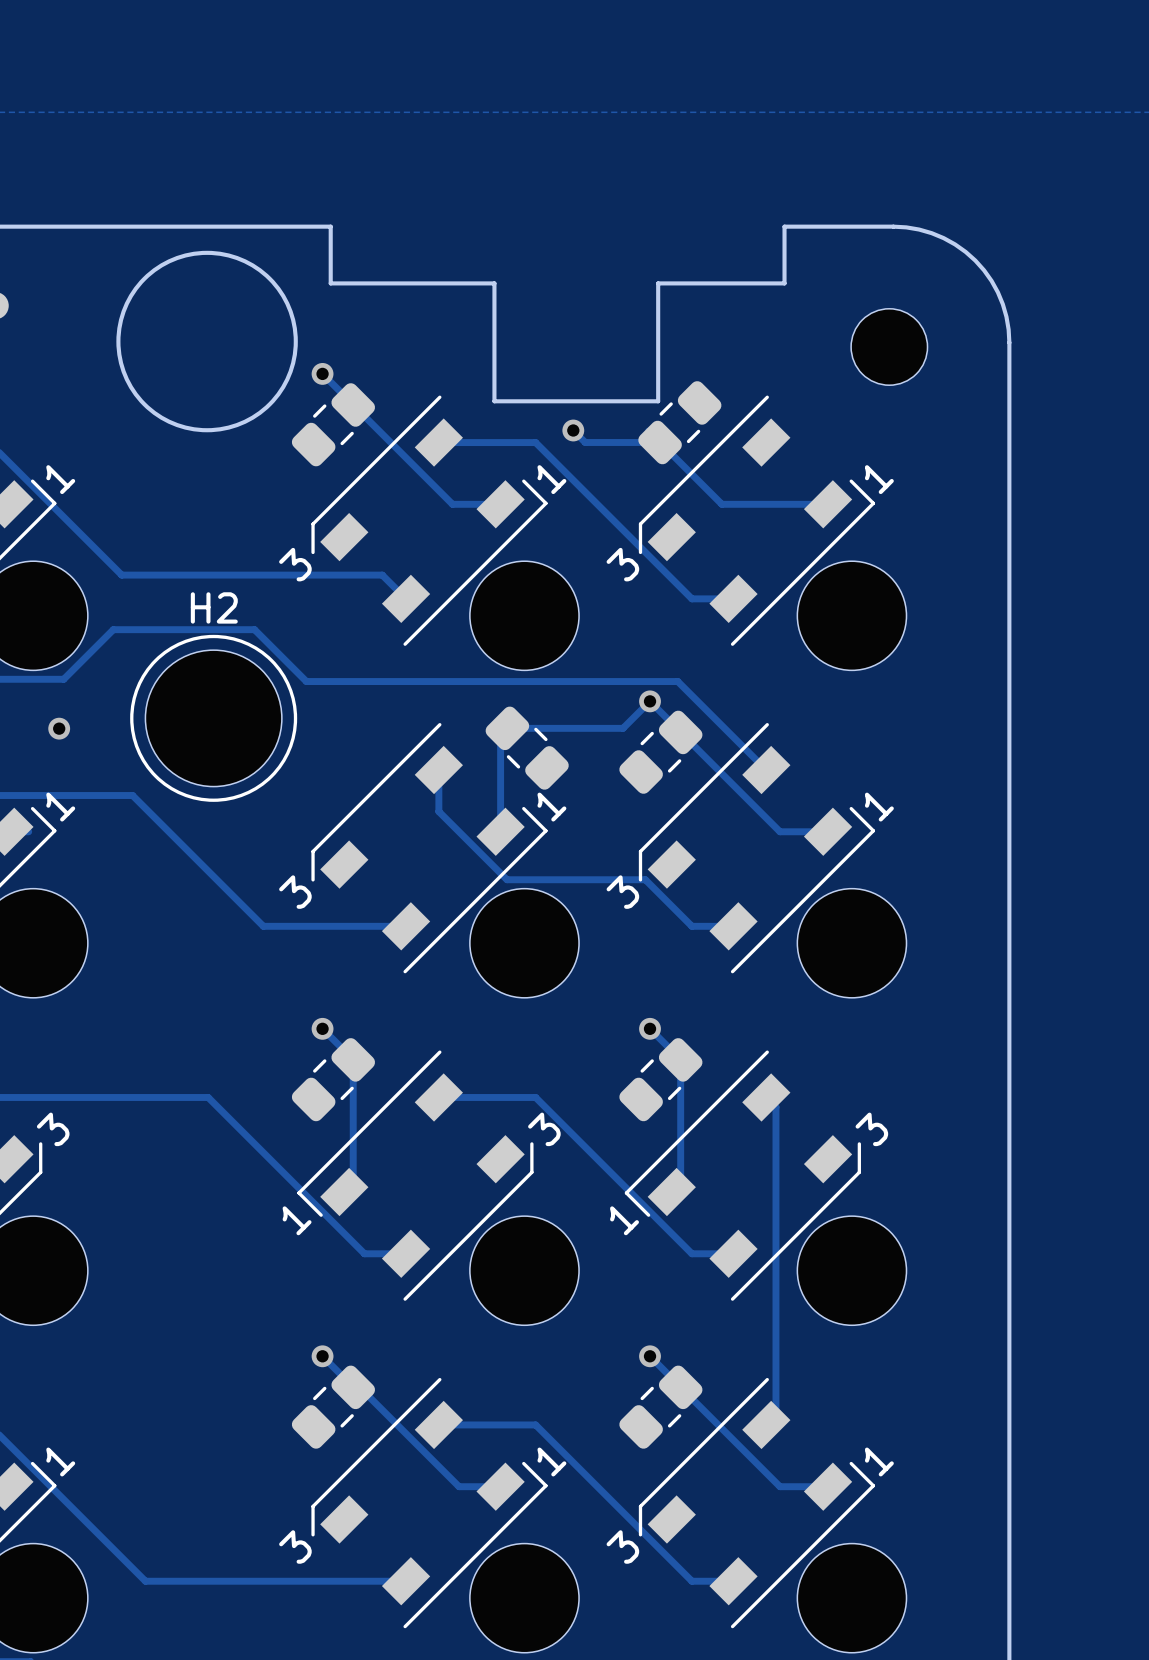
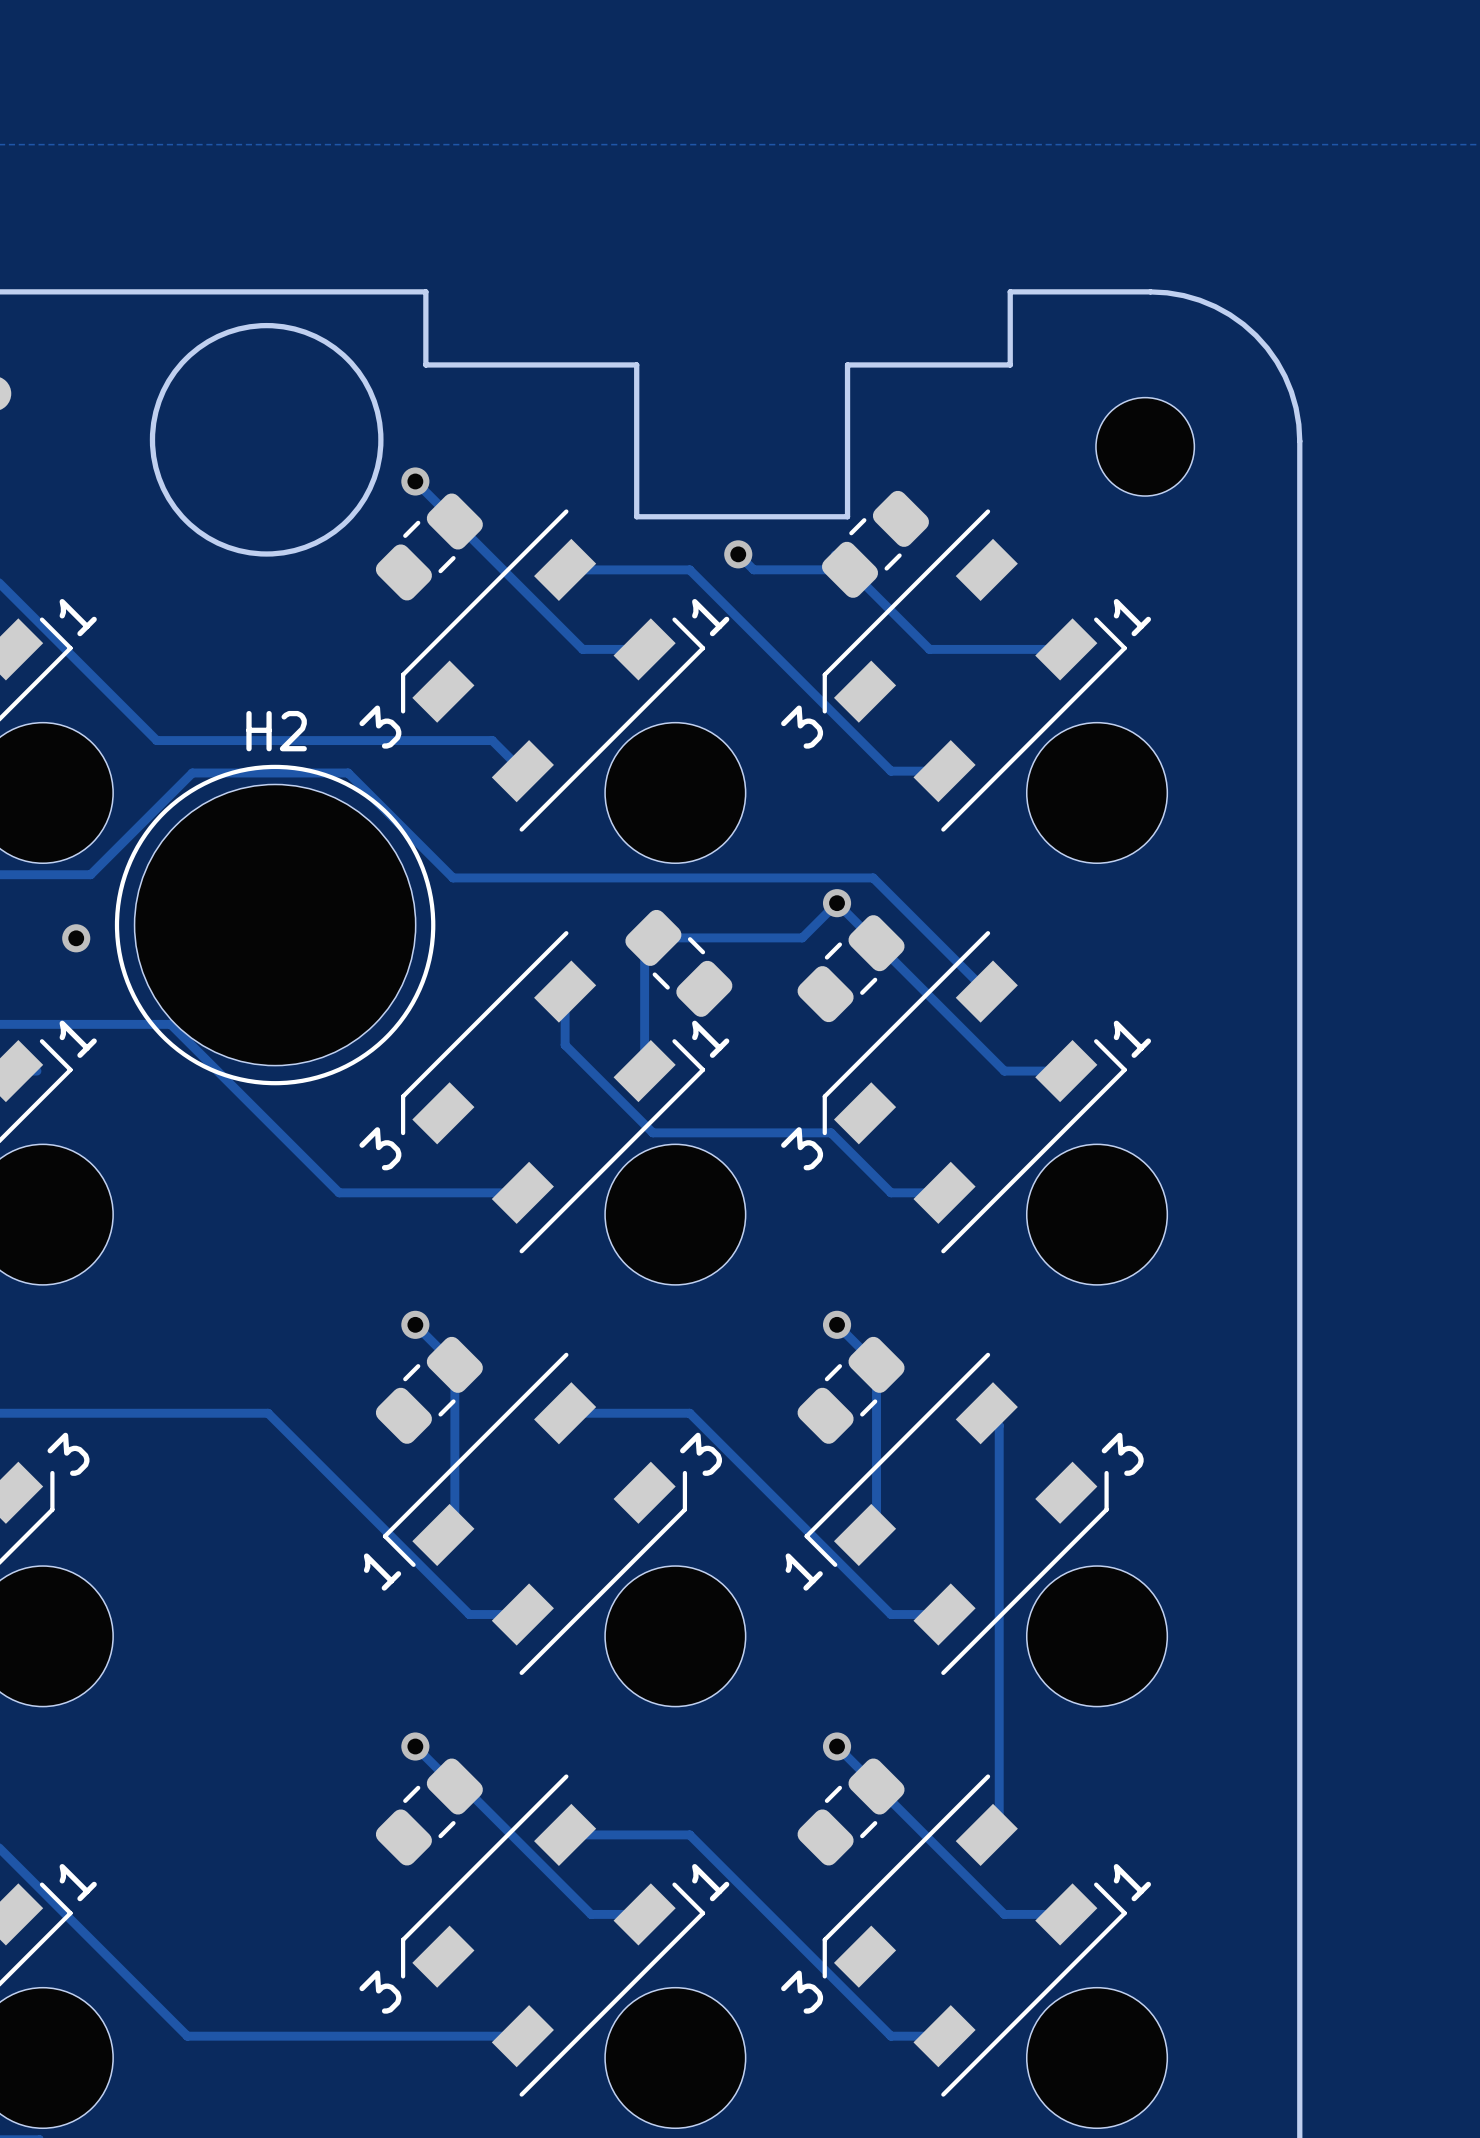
H2 footprint: [130, 634, 298, 802] -> [114, 764, 436, 1086]
track: (63, 679) (113, 629) (254, 629) (306, 681) (677, 681) -> (82, 874) (90, 874) (192, 772) (348, 772) (453, 877) (873, 877)

